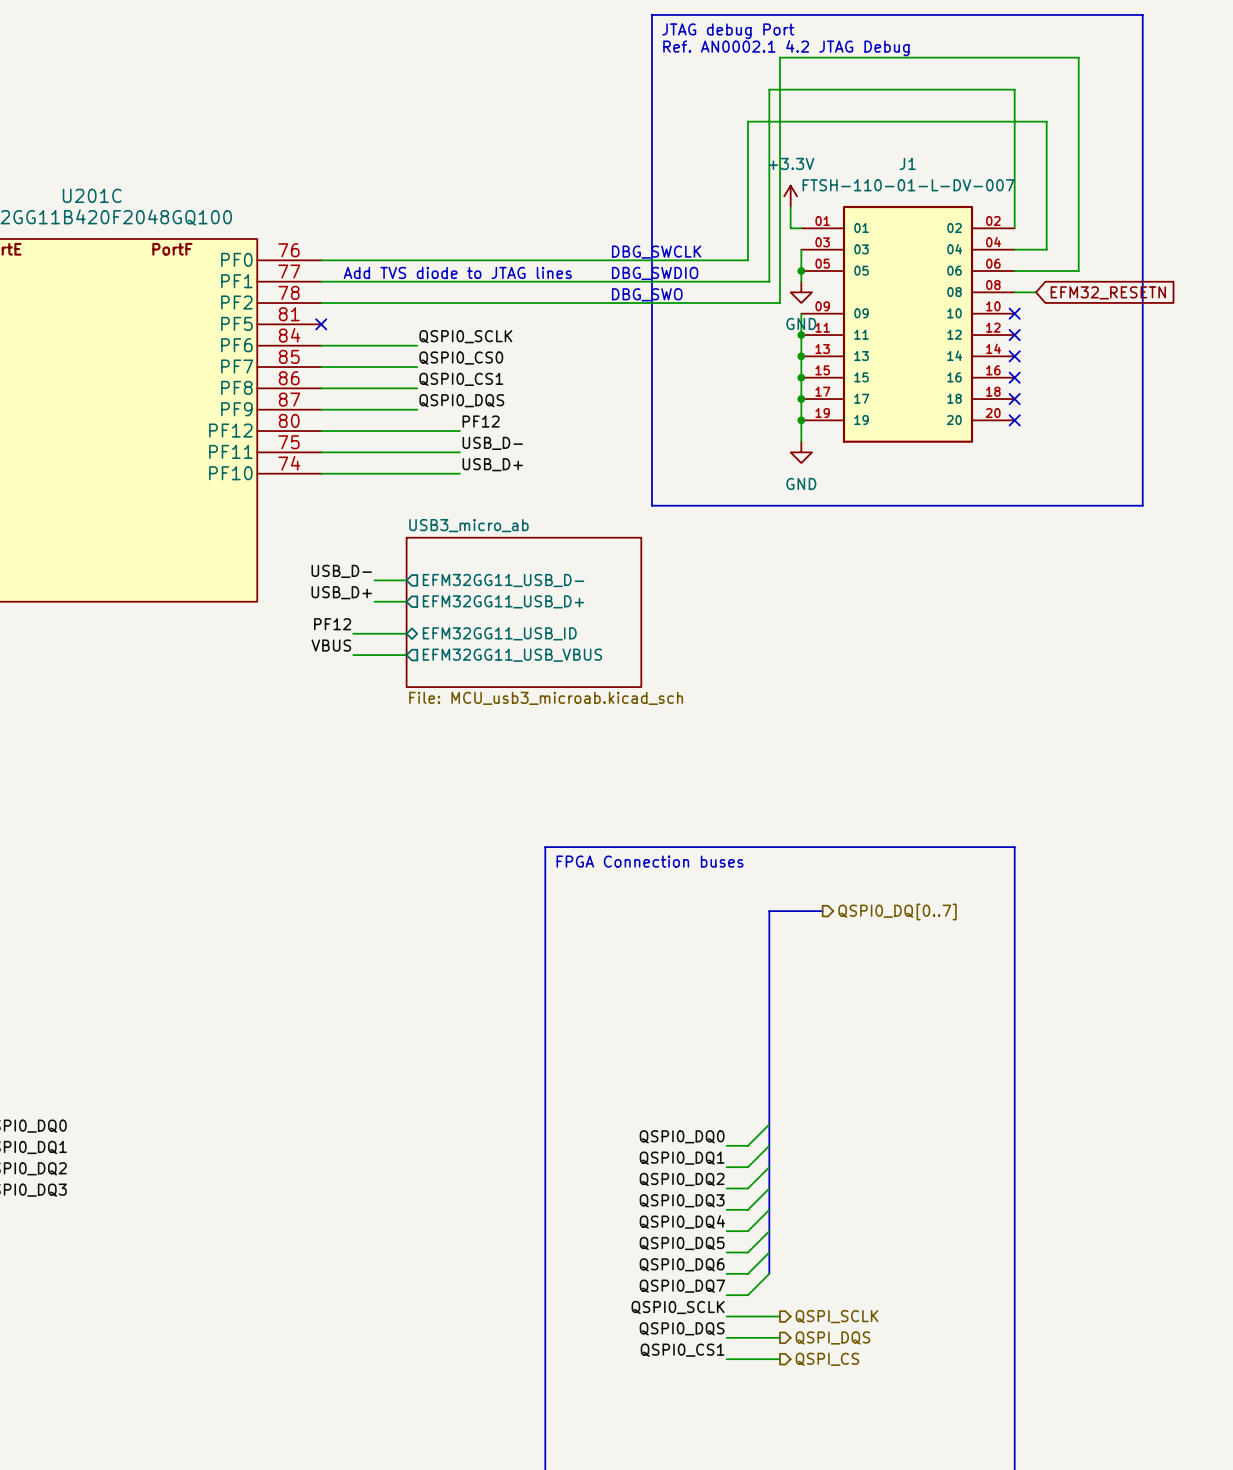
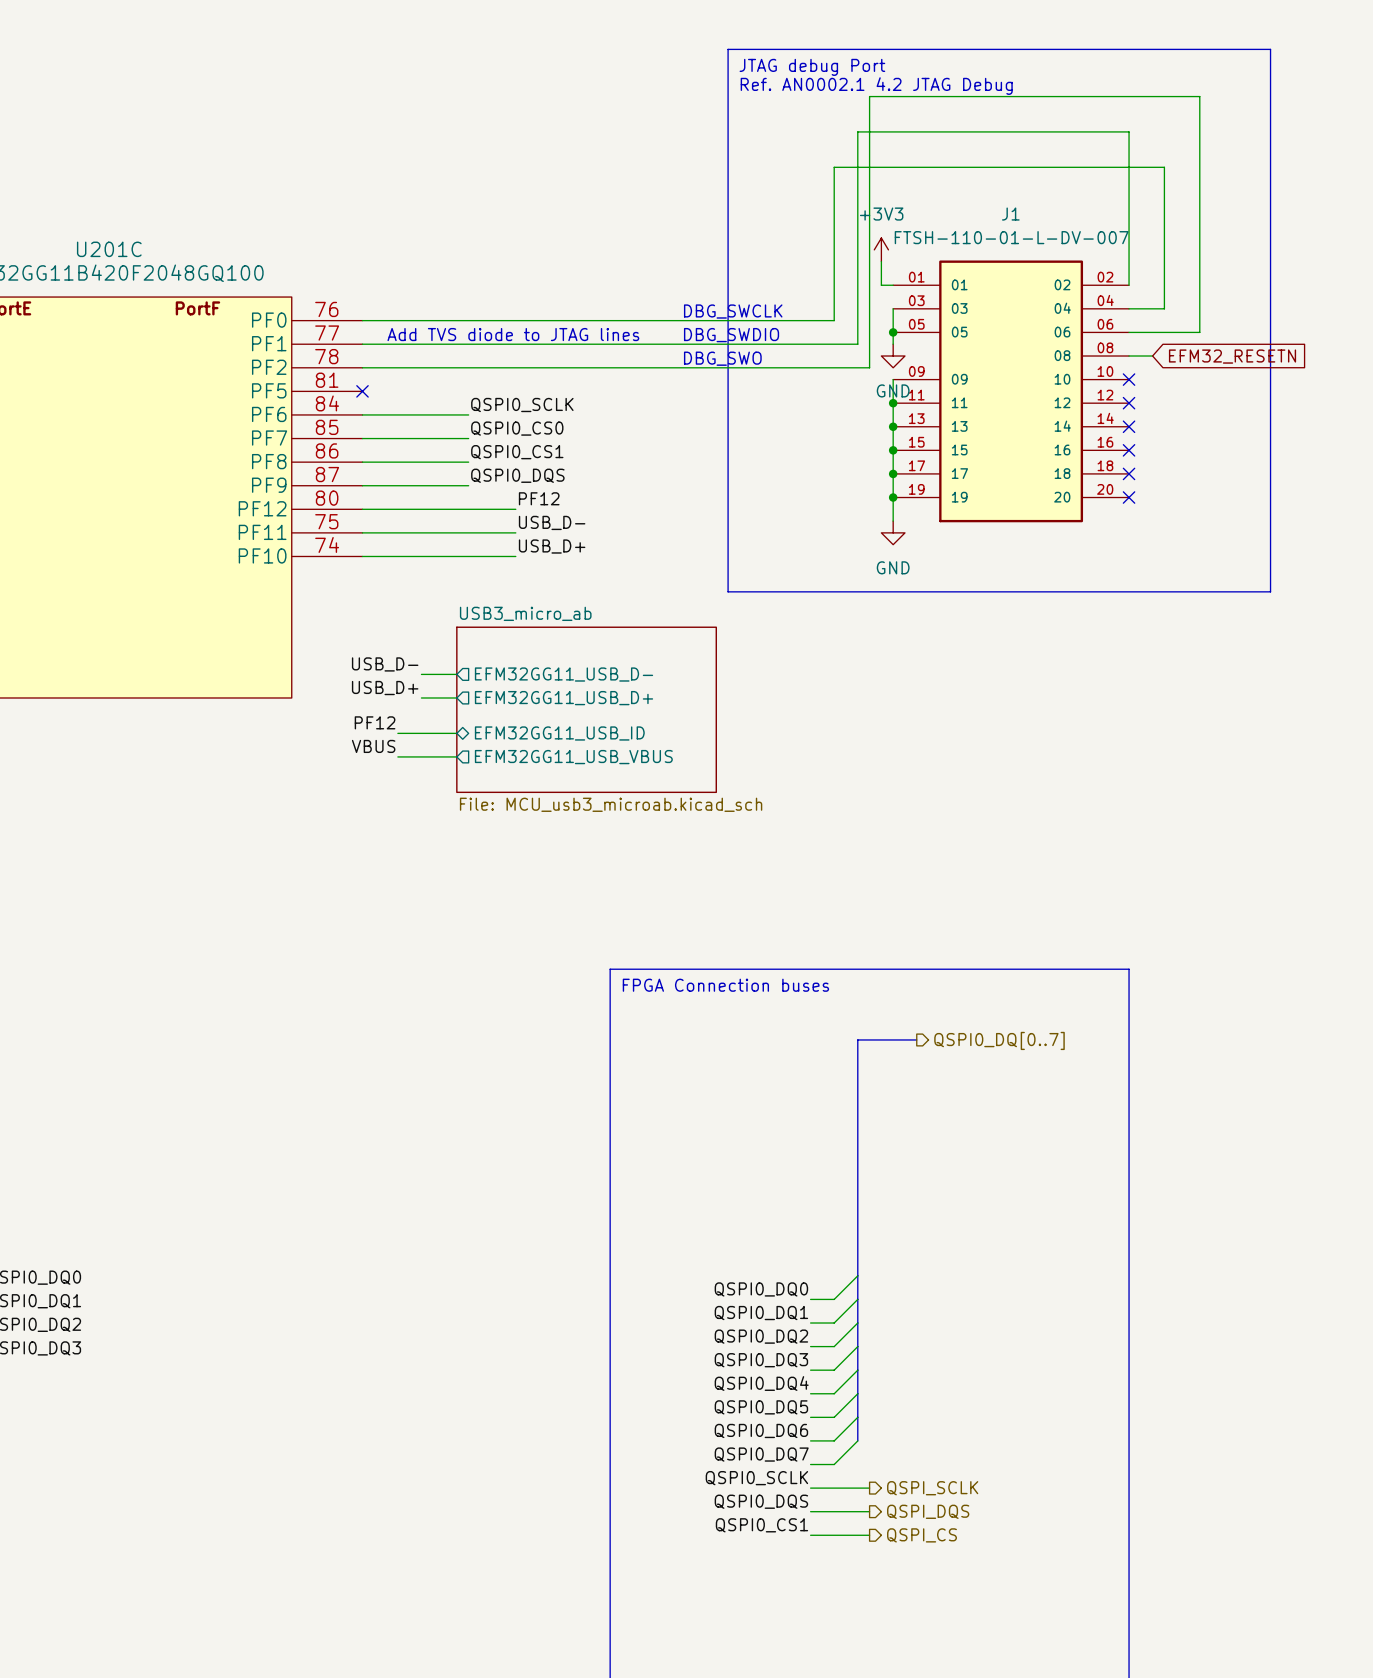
power symbol: +3.3V (790, 196) -> +3V3 (881, 249)

